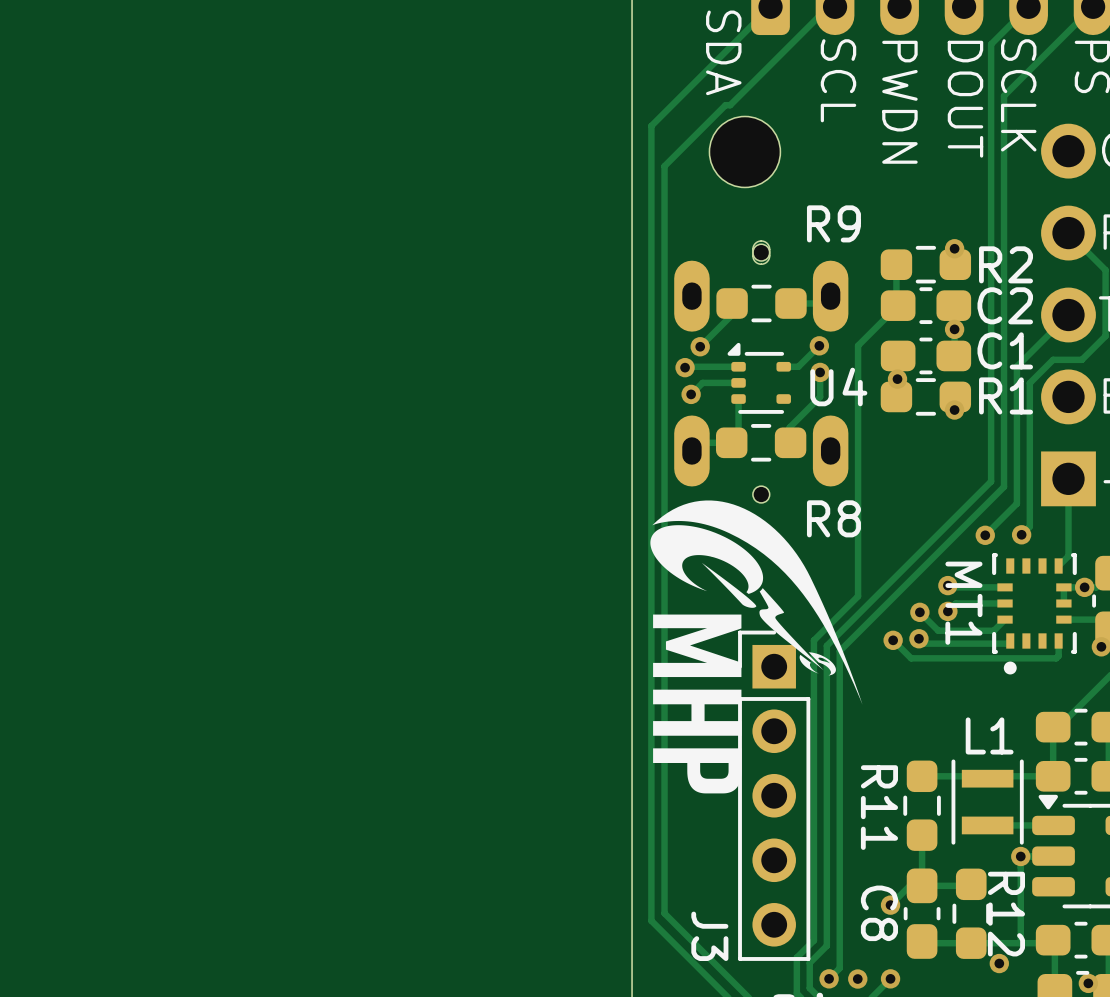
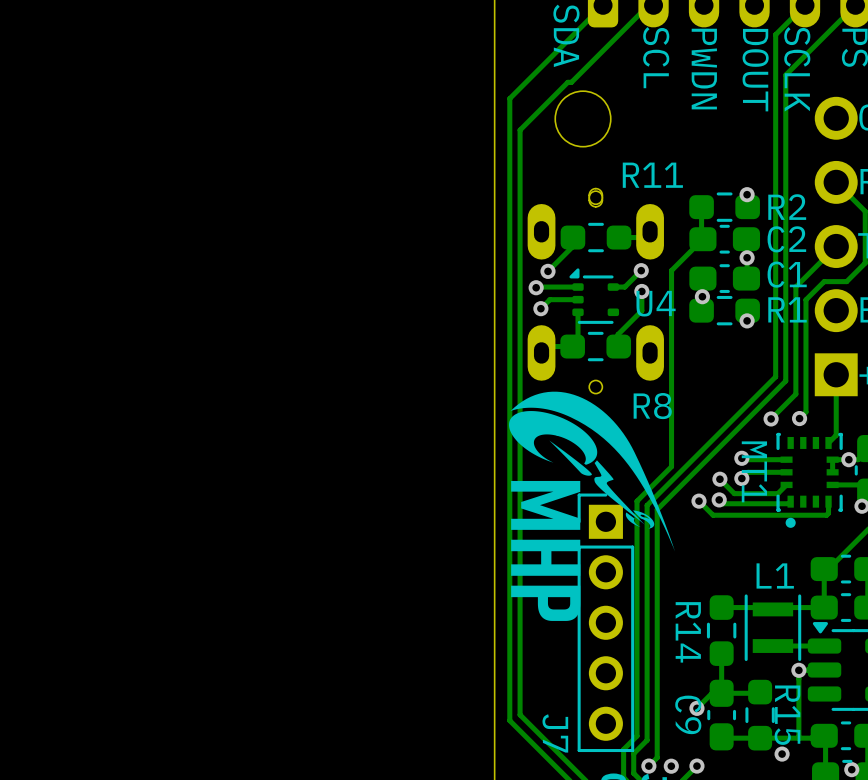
R9 name: R9 (833, 223) -> R11 (652, 175)
R11 name: R11 (879, 807) -> R14 (688, 632)
C8 name: C8 (879, 913) -> C9 (688, 714)
R12 name: R12 (1006, 914) -> R15 (787, 715)
J3 name: J3 (709, 936) -> J7 (555, 733)

